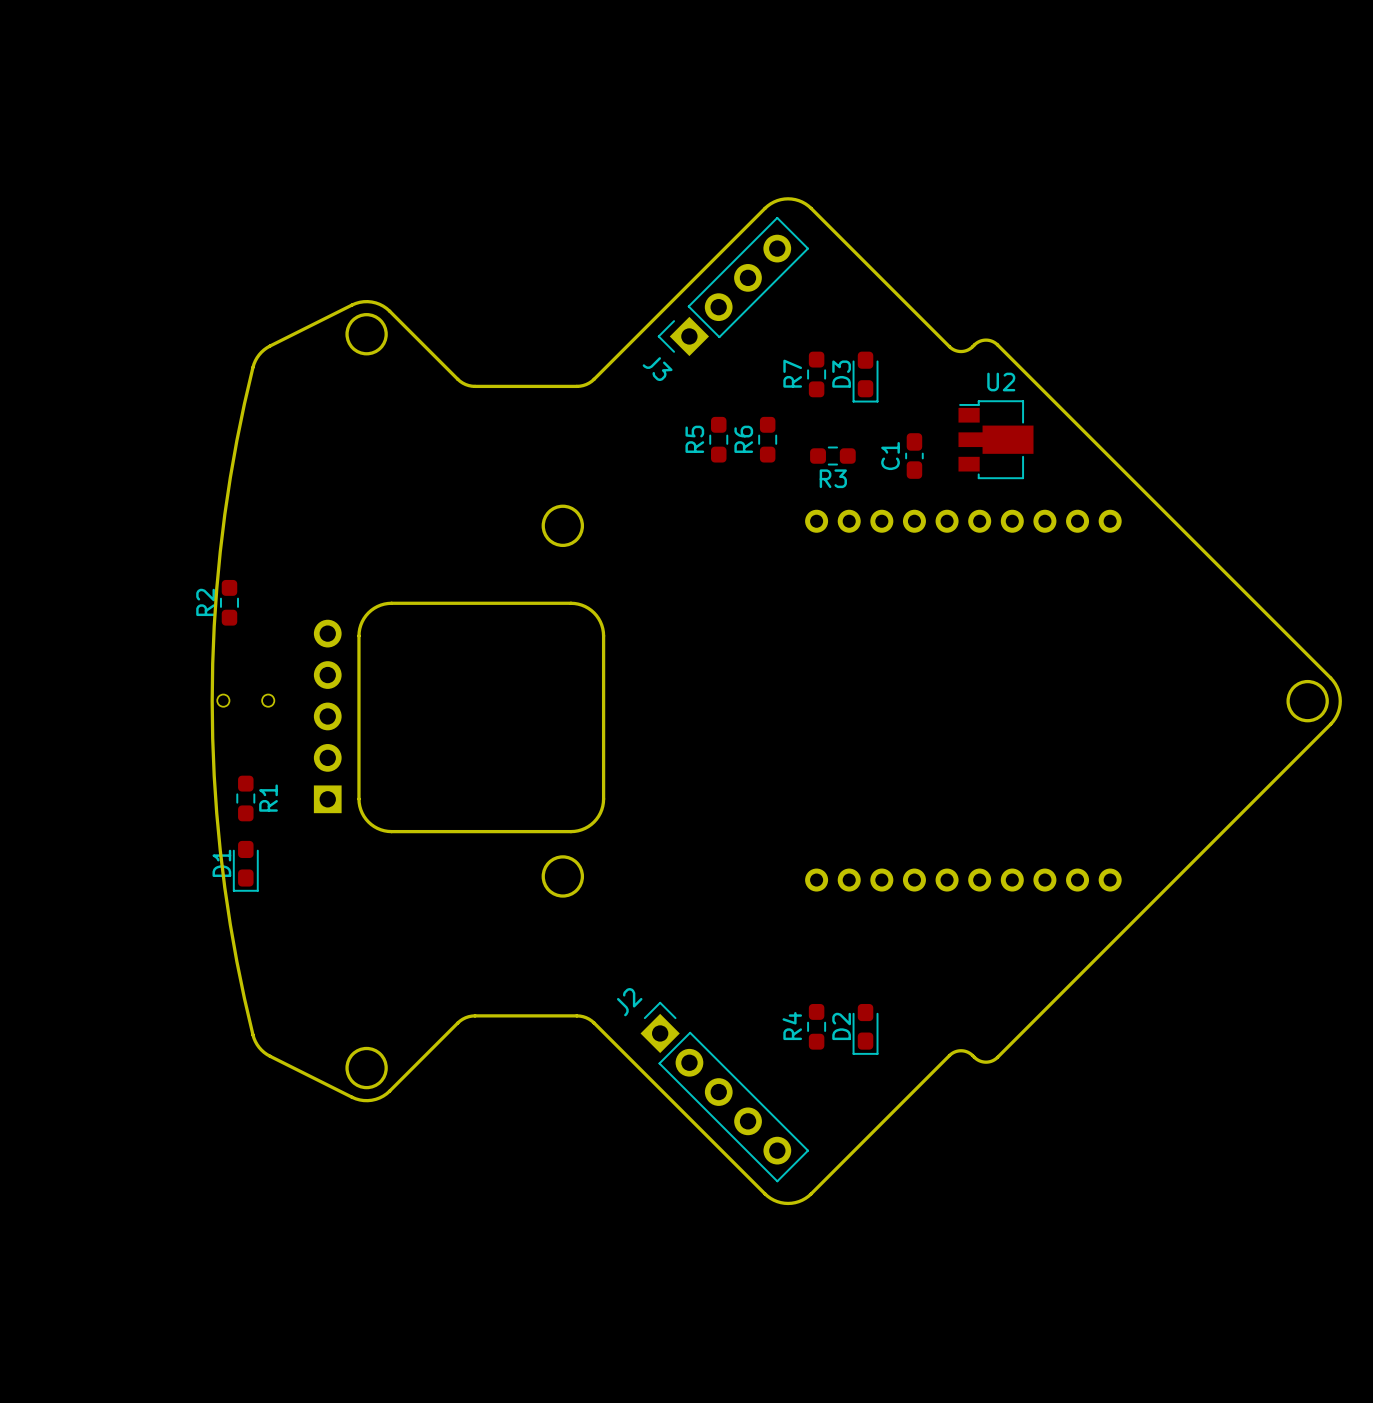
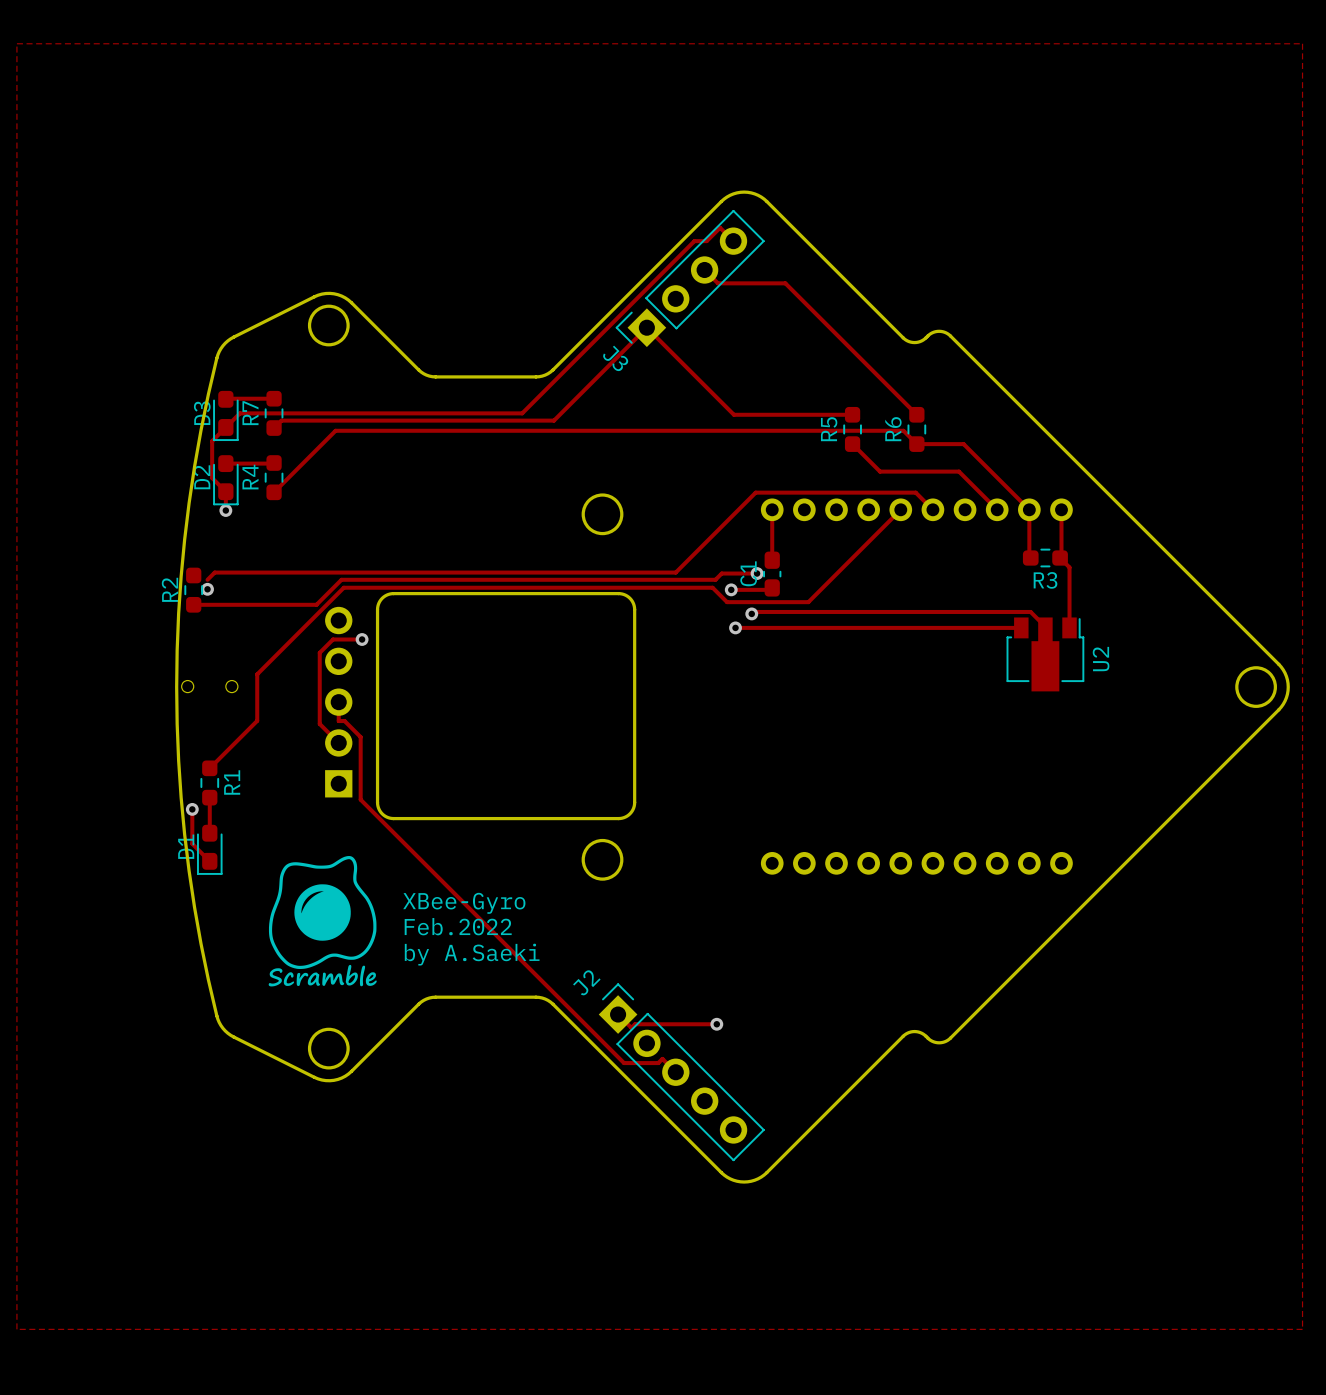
zone outline: none -> (16, 43) (16, 1329) (1302, 1329) (1302, 43) (16, 43)
track: none -> (733, 241) (720, 227) (706, 241) (694, 241) (522, 413) (239, 413) (212, 441) (212, 478) (225, 491) (225, 510)
track: none -> (704, 269) (717, 283) (785, 283) (916, 414)
R7 position: (816, 374) -> (274, 413)
D3 position: (865, 377) -> (225, 415)
track: none -> (274, 398) (225, 399)
track: none -> (852, 414) (733, 414) (646, 327) (553, 420) (281, 420) (274, 428)
R5 position: (718, 439) -> (852, 429)
R6 position: (767, 439) -> (916, 429)
U2 rotation: 0° (995, 439) -> 90° clockwise (1045, 654)
U2 position: (995, 439) -> (1045, 654)
track: none -> (852, 444) (880, 471) (959, 471) (997, 509)
R3 position: (832, 456) -> (1045, 558)
C1 position: (914, 456) -> (772, 574)
track: none -> (274, 462) (225, 463)
track: none -> (274, 492) (335, 430) (903, 430) (916, 444) (963, 444) (1029, 509) (1030, 558)
via: none -> (225, 510)
track: none -> (772, 509) (772, 560)
track: none -> (900, 509) (808, 602) (727, 602) (712, 587) (343, 587) (257, 674) (257, 720) (209, 768)
track: none -> (932, 509) (915, 492) (755, 492) (675, 572) (214, 572) (207, 579)
track: none -> (1061, 509) (1060, 558) (1069, 567) (1069, 627)
round board edge position: (562, 525) -> (602, 514)
track: none -> (757, 573) (721, 573) (715, 579) (341, 579) (316, 604) (193, 604)
via: none -> (757, 573)
track: none -> (772, 587) (770, 589) (731, 589)
via: none -> (207, 589)
via: none -> (731, 589)
board edge: (391, 603) (570, 603) (581, 605) (594, 612) (600, 621) (603, 635) (603, 798) (600, 813) (594, 822) (581, 829) (570, 831) (391, 831) (380, 829) (368, 822) (362, 813) (358, 798) (359, 632) (362, 621) (371, 610) (380, 605) (391, 603) -> (393, 593) (382, 598) (377, 609) (377, 802) (382, 813) (393, 818) (618, 818) (629, 813) (634, 802) (634, 609) (629, 598) (618, 593) (393, 593)
track: none -> (751, 613) (753, 611) (1030, 611) (1045, 626) (1045, 629)
via: none -> (751, 613)
track: none -> (735, 627) (1021, 627)
via: none -> (735, 627)
track: none -> (362, 639) (333, 639) (319, 652) (319, 723) (338, 742)
via: none -> (362, 639)
part position: (327, 716) -> (338, 702)
track: none -> (338, 702) (338, 721) (344, 721) (360, 737) (360, 799) (624, 1063) (658, 1063) (662, 1058) (675, 1072)
track: none -> (209, 797) (209, 833)
track: none -> (192, 809) (192, 843) (209, 861)
via: none -> (192, 809)
drawing: none -> [268, 856, 377, 987]
round board edge position: (562, 876) -> (602, 859)
text: none -> XBee-Gyro (464, 903)
text: none -> Feb.2022 (458, 926)
text: none -> by A.Saeki (472, 954)
R4 position: (816, 1026) -> (274, 477)
D2 position: (865, 1029) -> (225, 480)
track: none -> (618, 1014) (631, 1027) (635, 1024) (716, 1024)
via: none -> (716, 1024)

